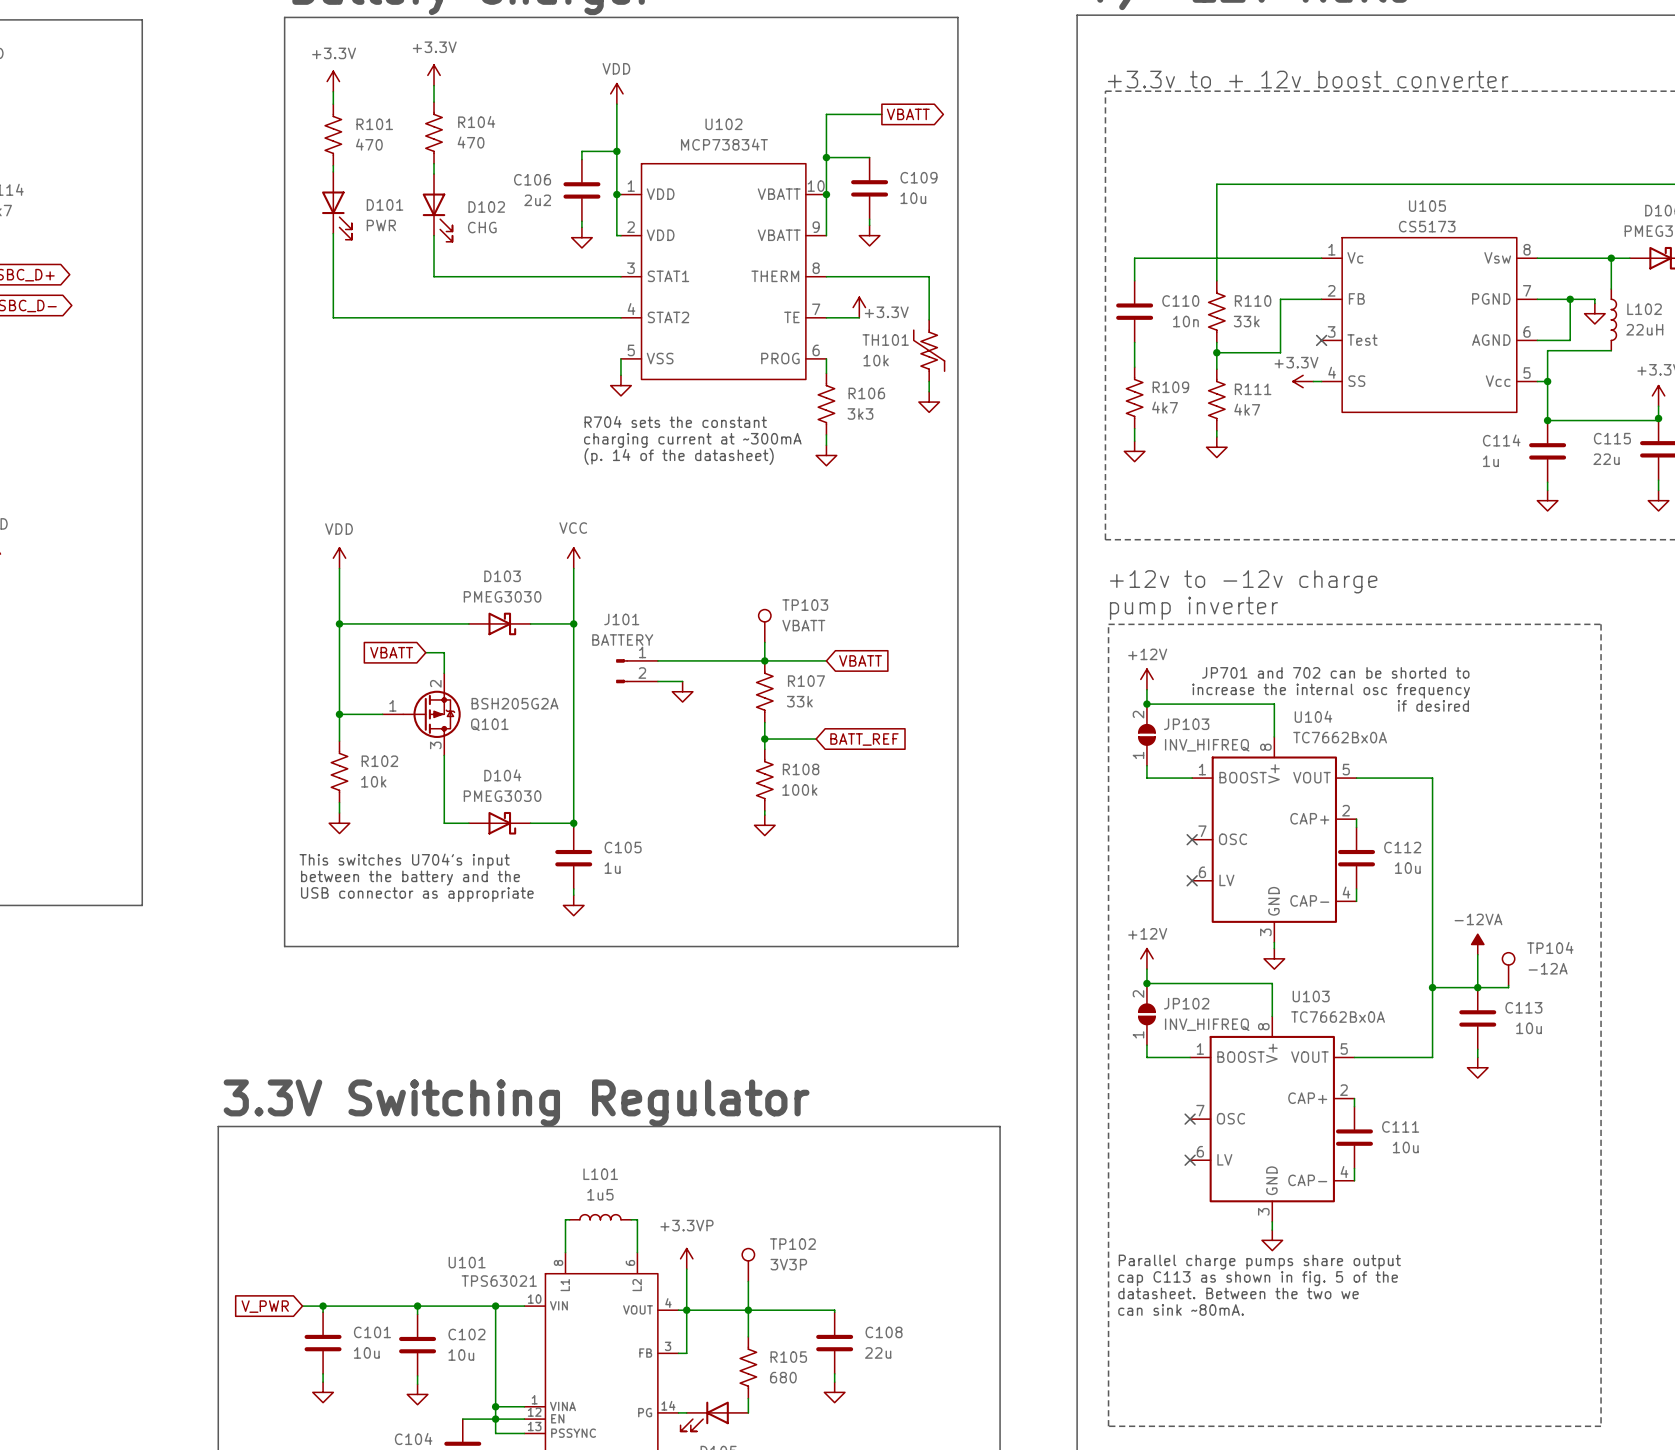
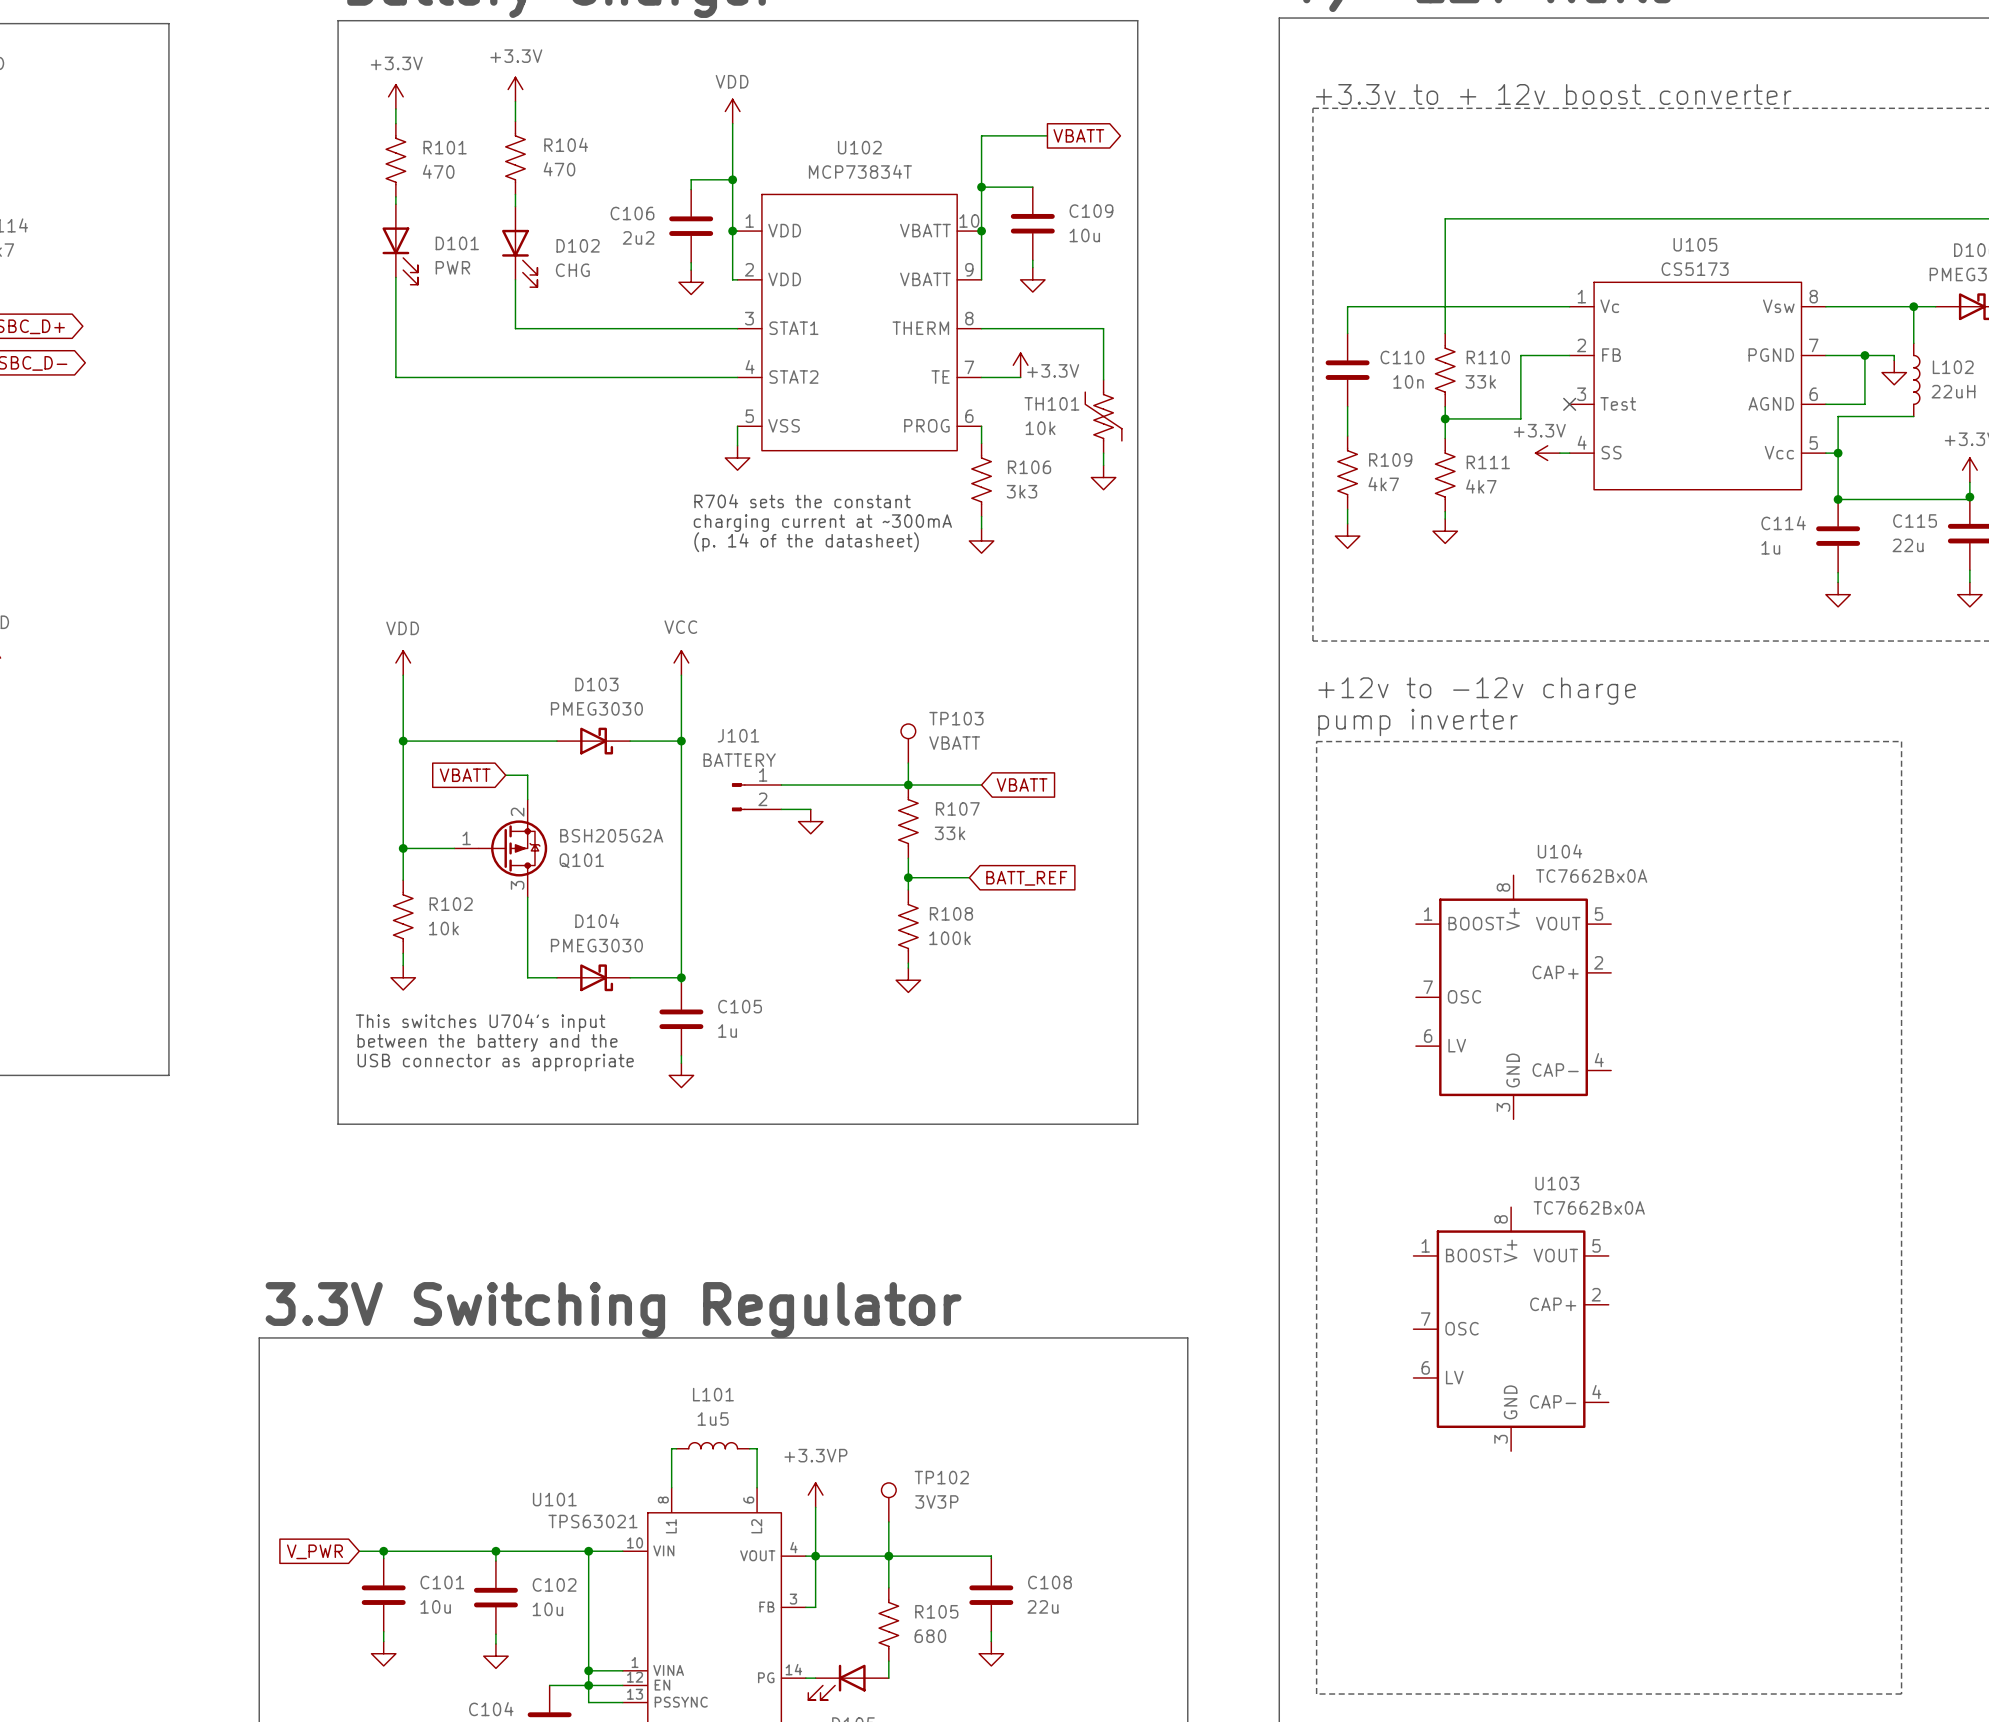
text: JP701 and 702 can be shorted to (1335, 672) -> none
power symbol: +12V (1146, 679) -> none
wire: (1146, 689) (1146, 704) (1274, 704) (1274, 736) -> none
text: increase the internal osc frequency (1331, 691) -> none
junction: (1146, 704) -> none
text: if desired (1433, 705) -> none
JP103: INV_HIFREQ (1146, 734) -> none
wire: (1146, 765) (1146, 778) (1192, 778) -> none
wire: (1356, 778) (1432, 778) (1432, 1057) (1354, 1057) -> none
wire: (1356, 819) (1356, 827) -> none
no-connect mark: (1192, 839) -> none
C112: 10u (1356, 858) -> none
no-connect mark: (1192, 880) -> none
wire: (1356, 889) (1356, 901) -> none
wire: (1274, 942) (1274, 948) -> none
power symbol: -12VA (1477, 944) -> none
wire: (1477, 954) (1477, 987) -> none
power symbol: +12V (1146, 958) -> none
power symbol: (1274, 958) -> none
wire: (1146, 969) (1146, 983) (1272, 983) (1272, 1016) -> none
TP104: -12A (1508, 969) -> none
junction: (1146, 983) -> none
wire: (1508, 985) (1508, 987) (1432, 987) -> none
junction: (1432, 987) -> none
junction: (1477, 987) -> none
JP102: INV_HIFREQ (1146, 1014) -> none
C113: 10u (1477, 1018) -> none
wire: (1146, 1045) (1146, 1057) (1190, 1057) -> none
wire: (1477, 1049) (1477, 1057) -> none
power symbol: (1477, 1067) -> none
wire: (1354, 1098) (1354, 1106) -> none
no-connect mark: (1190, 1119) -> none
C111: 10u (1354, 1137) -> none
no-connect mark: (1190, 1160) -> none
wire: (1354, 1168) (1354, 1180) -> none
wire: (1272, 1221) (1272, 1230) -> none
power symbol: (1272, 1240) -> none
text: Parallel charge pumps share output (1259, 1262) -> none
text: cap C113 as shown in fig. 5 of the (1258, 1278) -> none
text: datasheet. Between the two we (1238, 1293) -> none
text: can sink ~80mA. (1181, 1310) -> none

